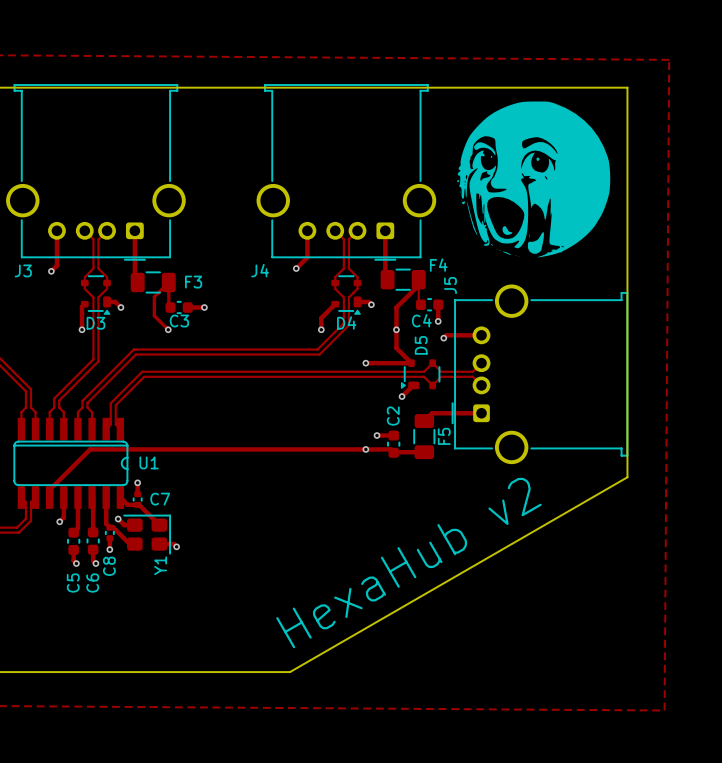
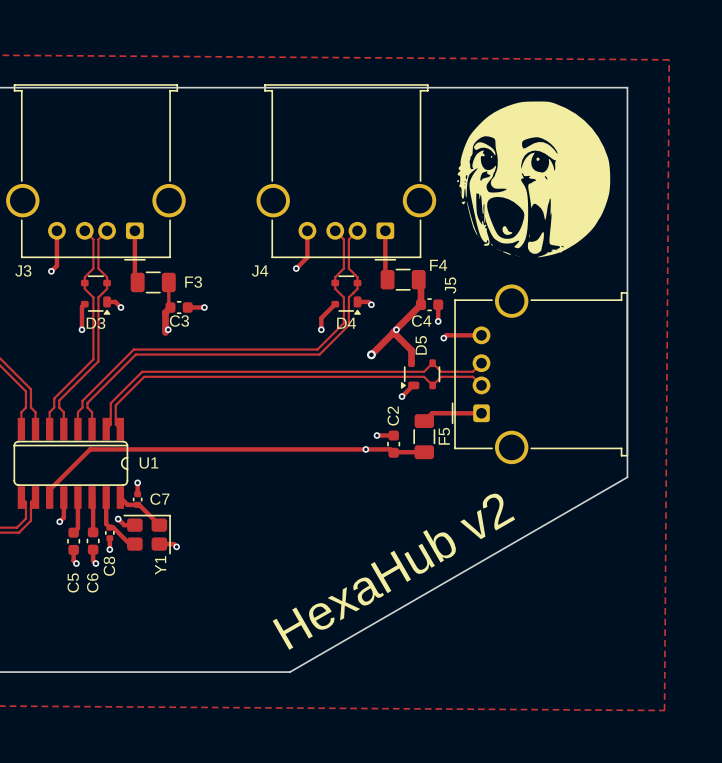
track: none -> (418, 279) (420, 281) (420, 304) (393, 332)
track: (168, 282) (154, 296) (154, 315) (168, 329) -> none
track: (420, 304) (418, 302) (418, 279) (418, 285) (396, 307) (396, 348) (411, 363) (365, 363) -> none
track: none -> (168, 309) (165, 312) (165, 332)
track: none -> (393, 332) (411, 350) (411, 363)
track: none -> (393, 332) (371, 354)
via: none -> (371, 354)
via: (365, 363) -> none

